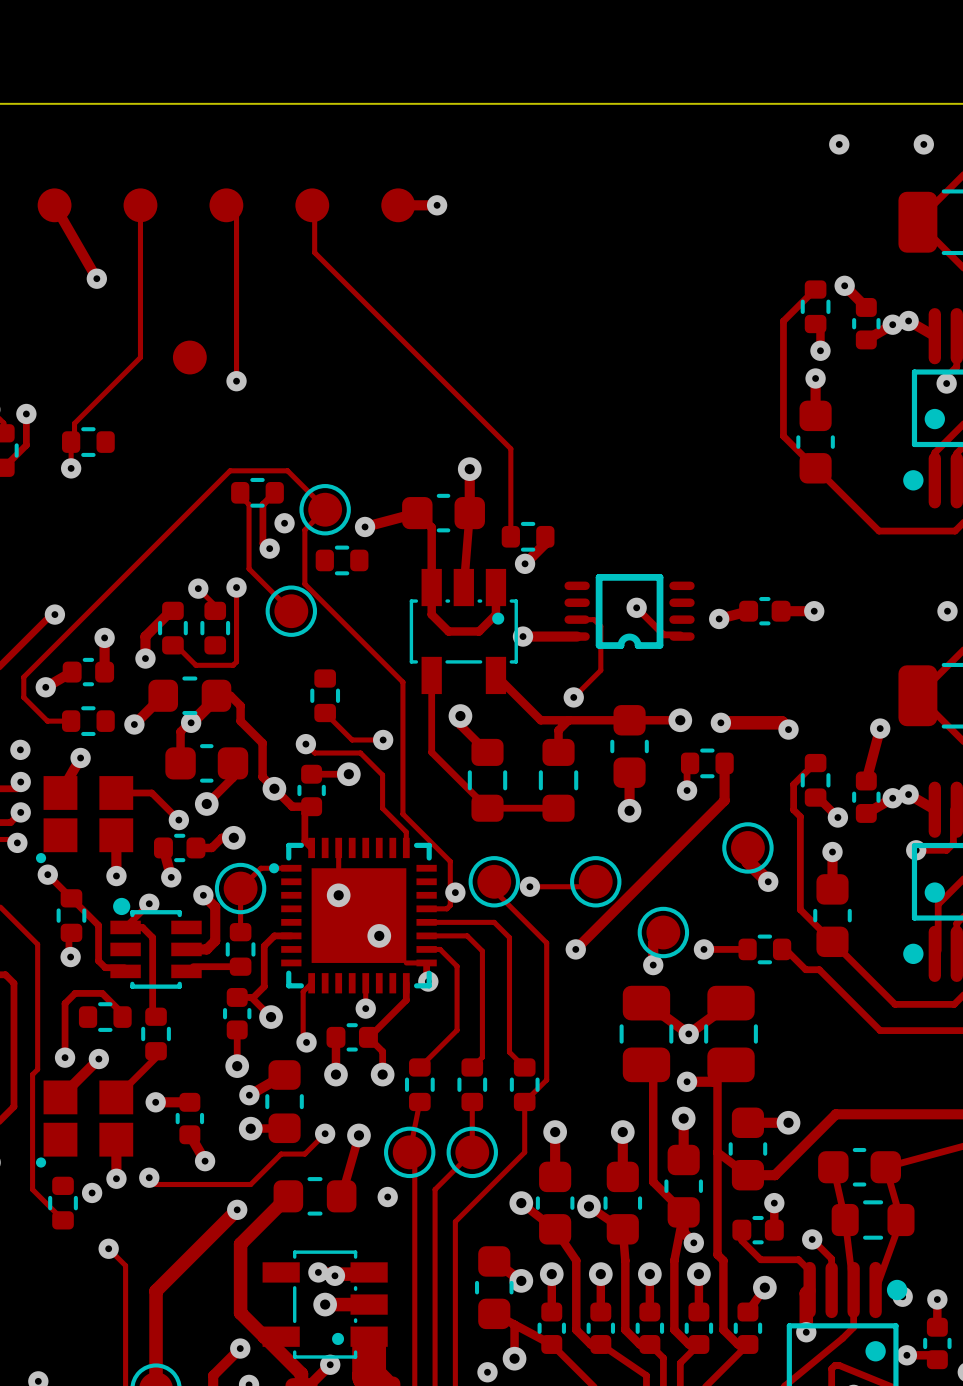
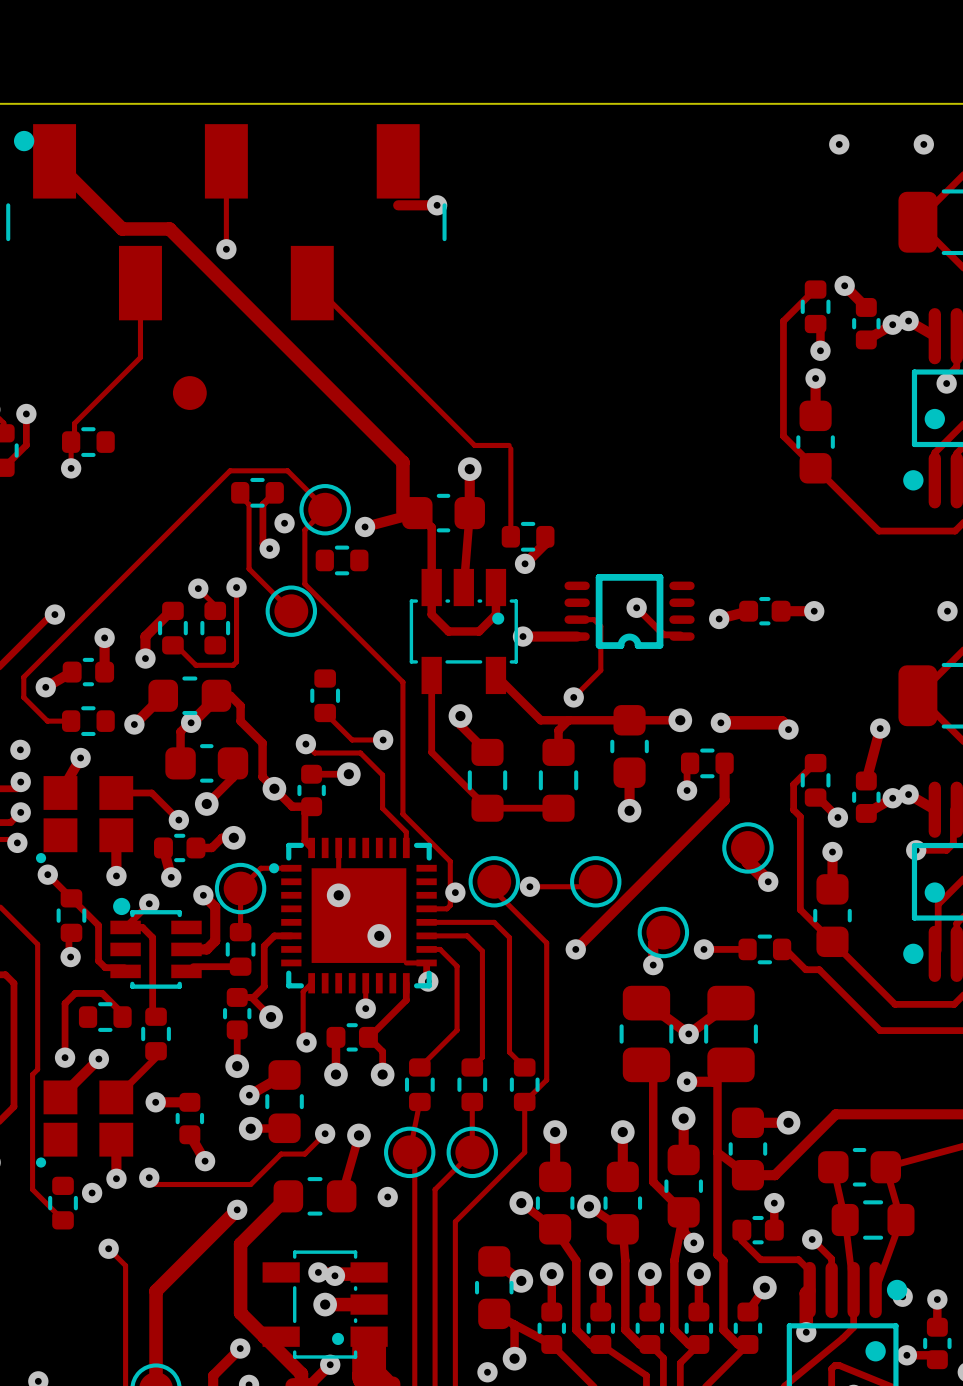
track: none -> (55, 162) (122, 228) (169, 228) (402, 462) (402, 512)
track: none -> (226, 162) (226, 248)
part footprint: [37, 188, 416, 223] -> [6, 124, 447, 321]
track: (54, 205) (96, 278) -> none
track: (140, 206) (140, 284) -> none
track: (314, 206) (314, 252) (510, 448) -> none
track: (236, 215) (236, 381) -> none
via: none -> (226, 249)
via: (96, 278) -> none
track: none -> (313, 283) (474, 445) (509, 445)
part position: (189, 357) -> (189, 393)
via: (236, 381) -> none

